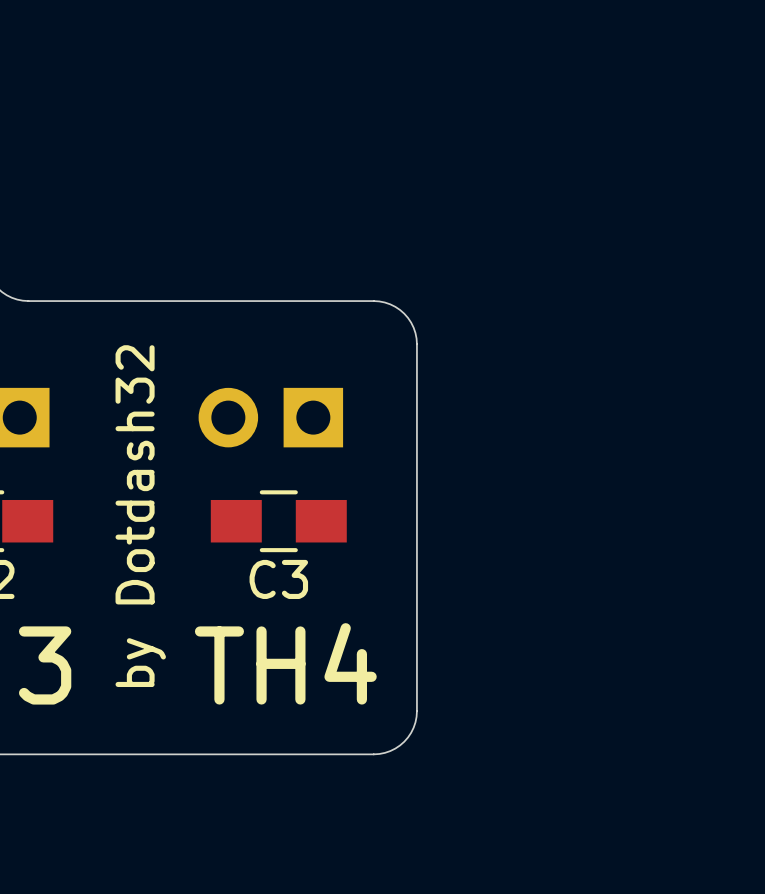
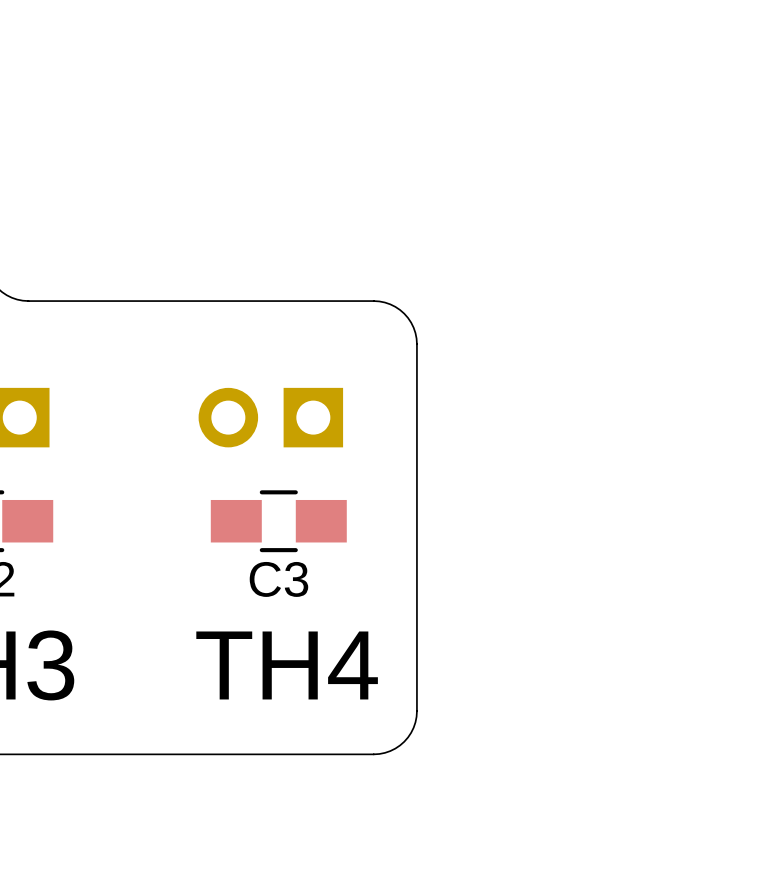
text: by Dotdash32 (140, 516) -> none

